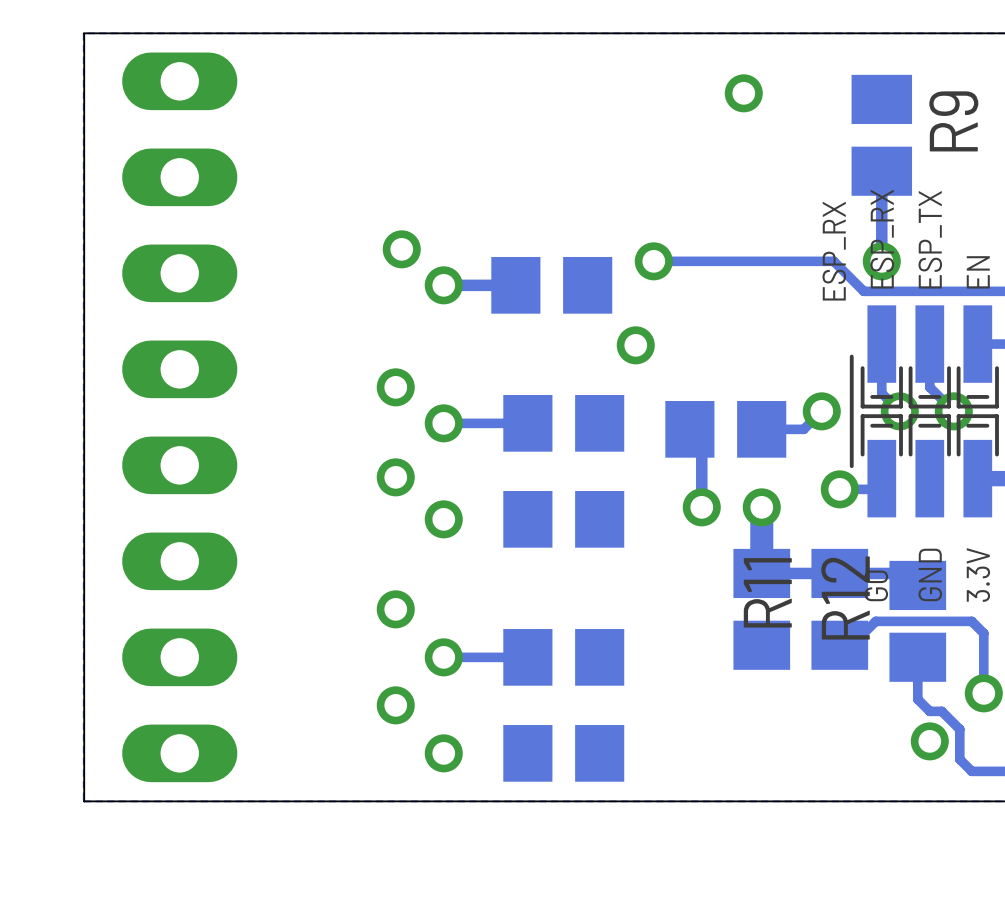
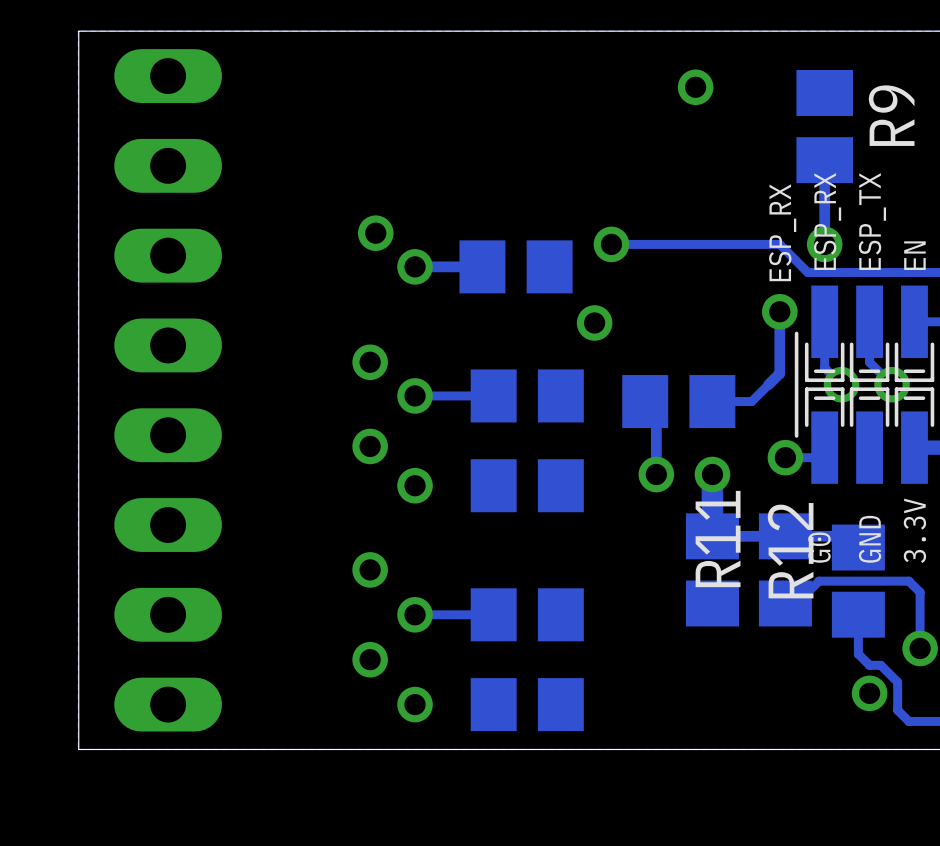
track: none -> (779, 311) (779, 373) (768, 384)
via position: (821, 411) -> (779, 311)

